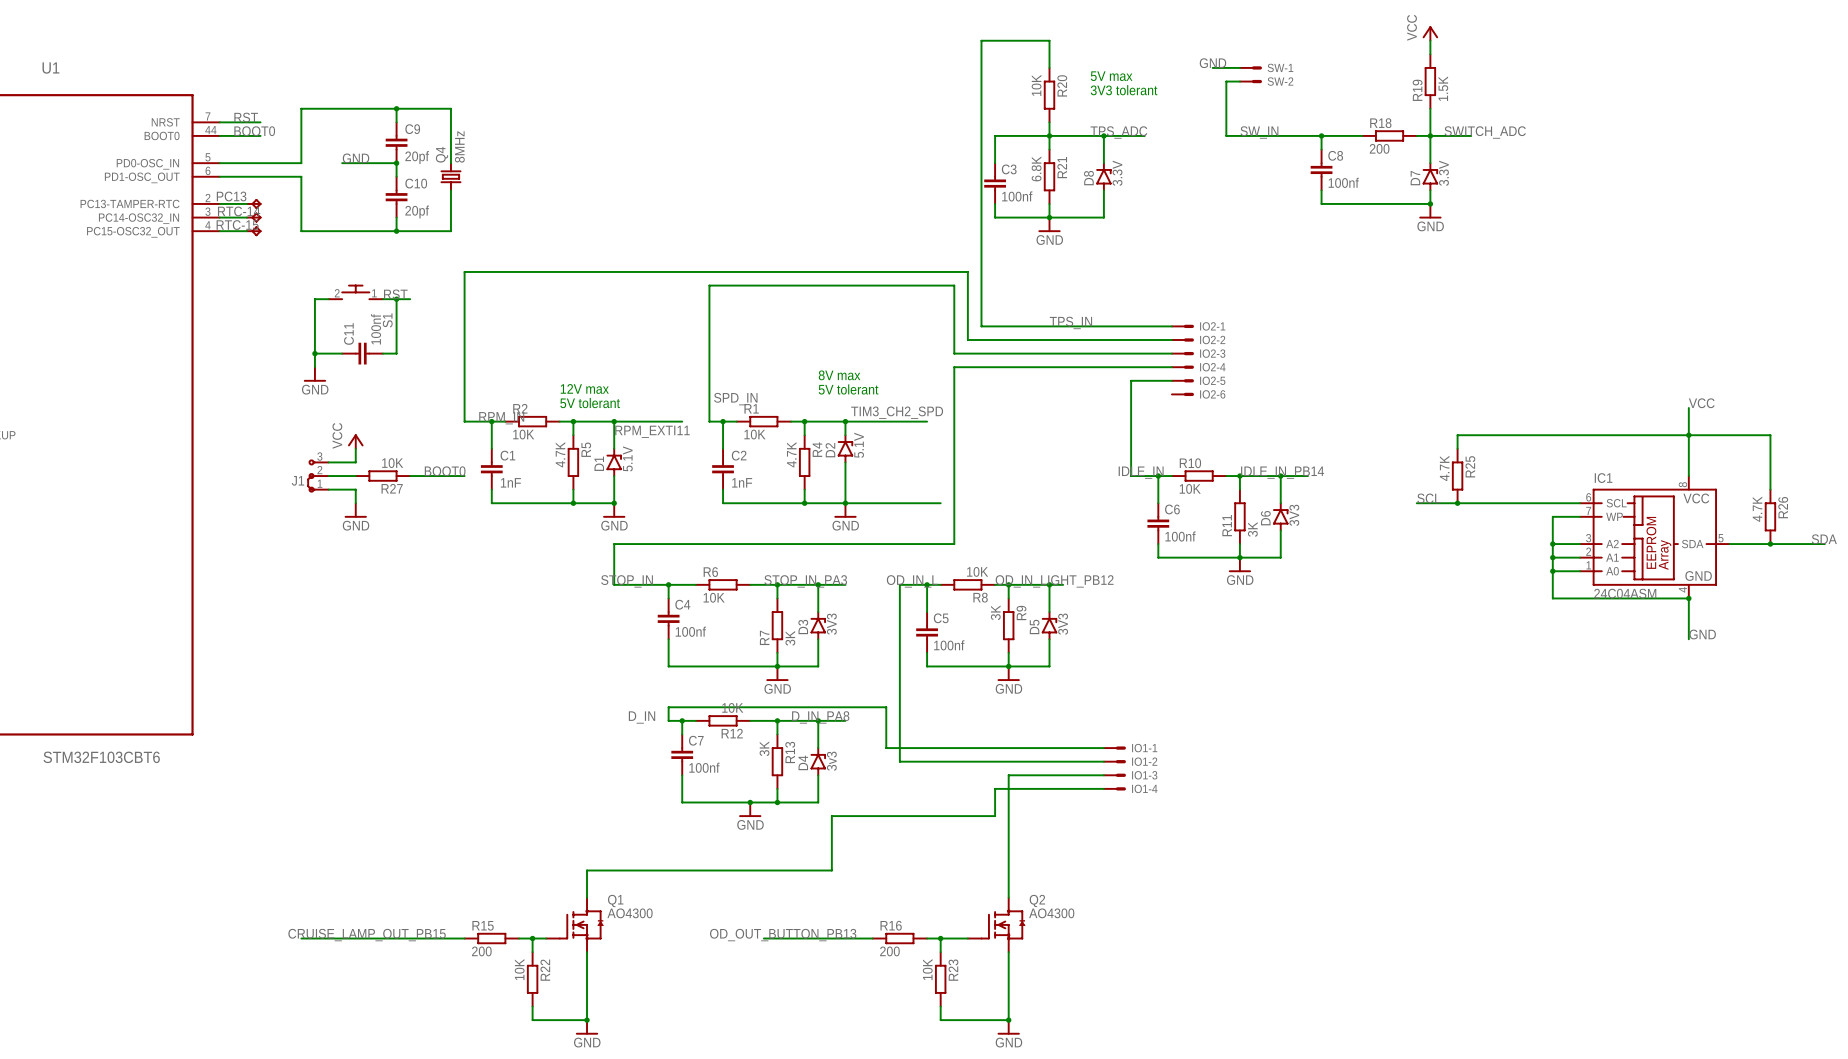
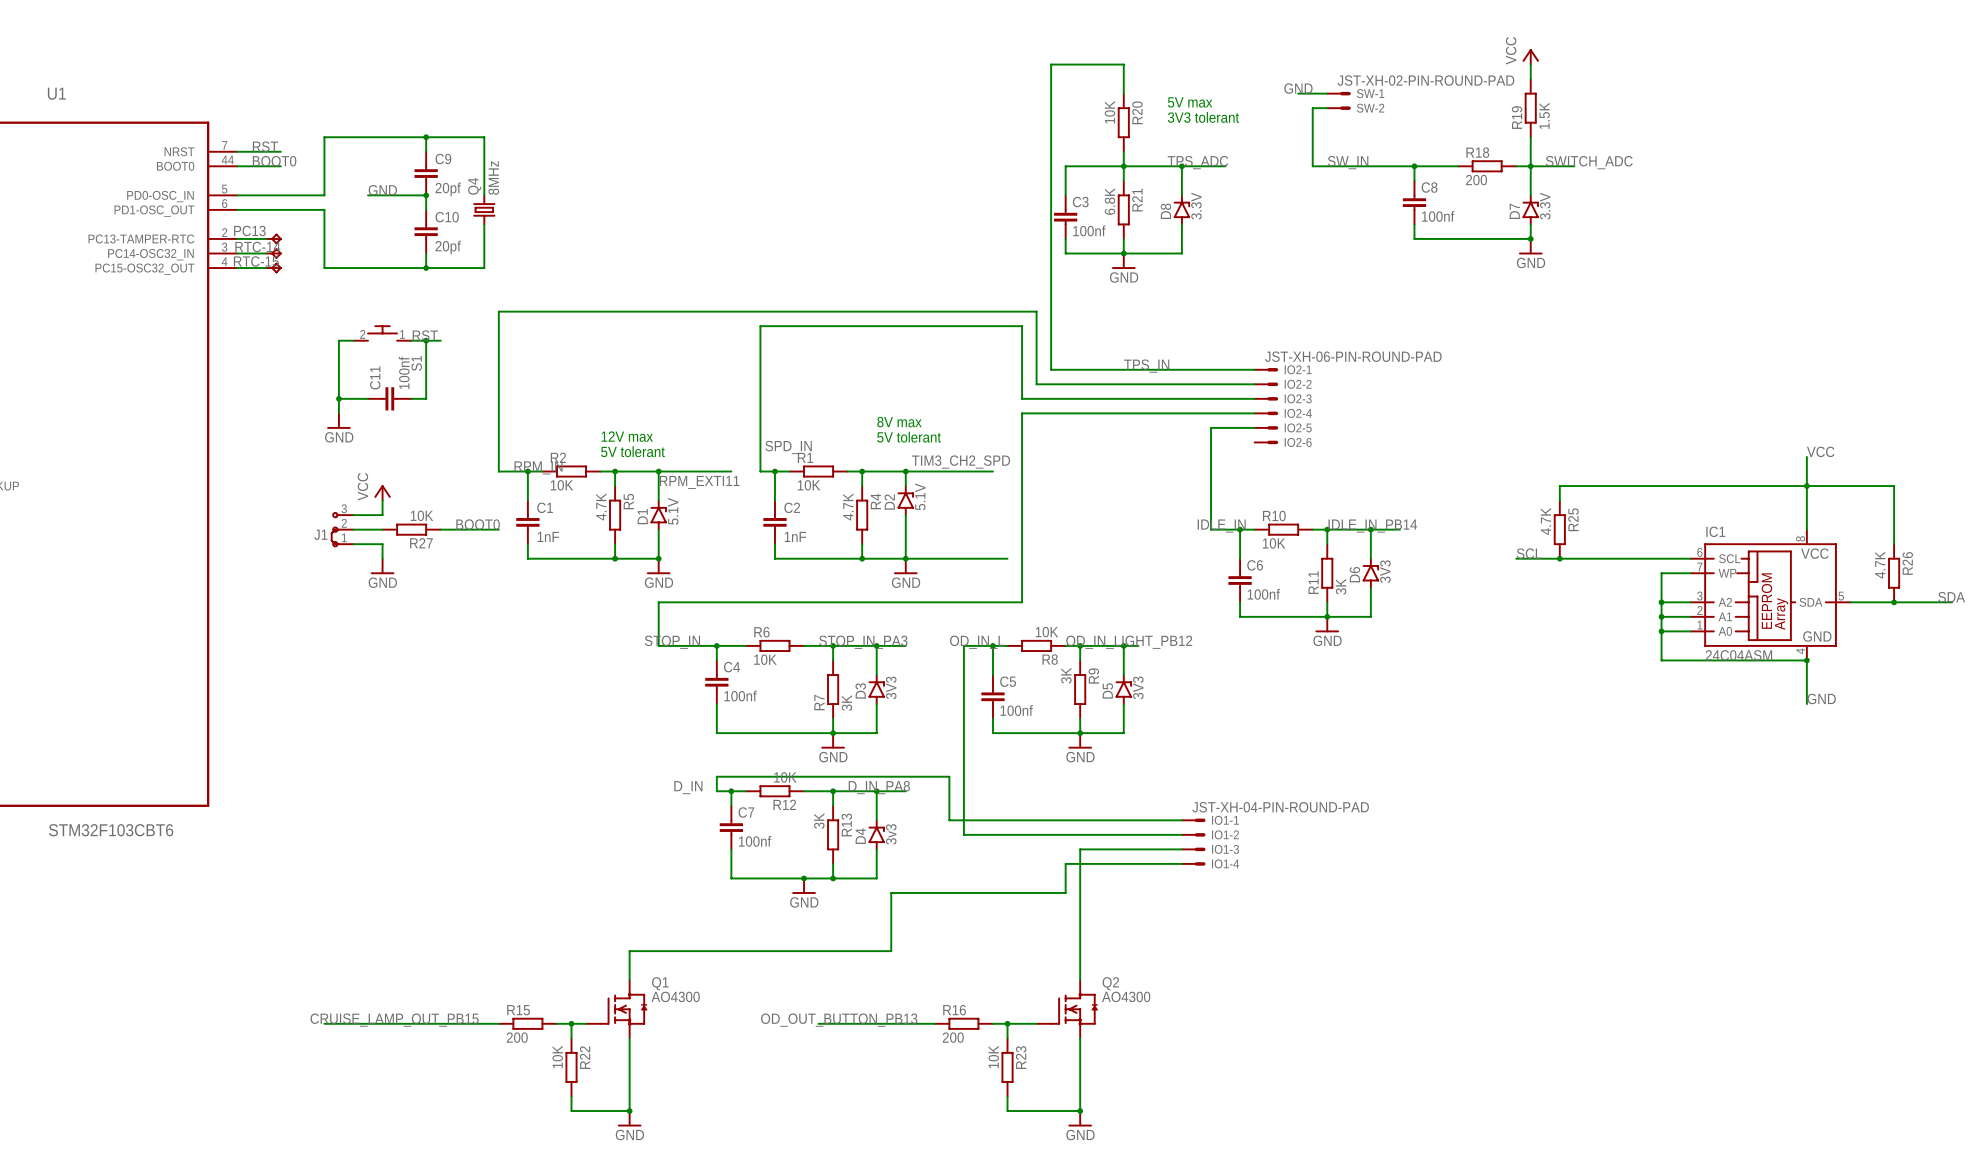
SW-1 value: none -> JST-XH-02-PIN-ROUND-PAD (1425, 80)
IO2-1 value: none -> JST-XH-06-PIN-ROUND-PAD (1353, 356)
IO1-1 value: none -> JST-XH-04-PIN-ROUND-PAD (1280, 807)

